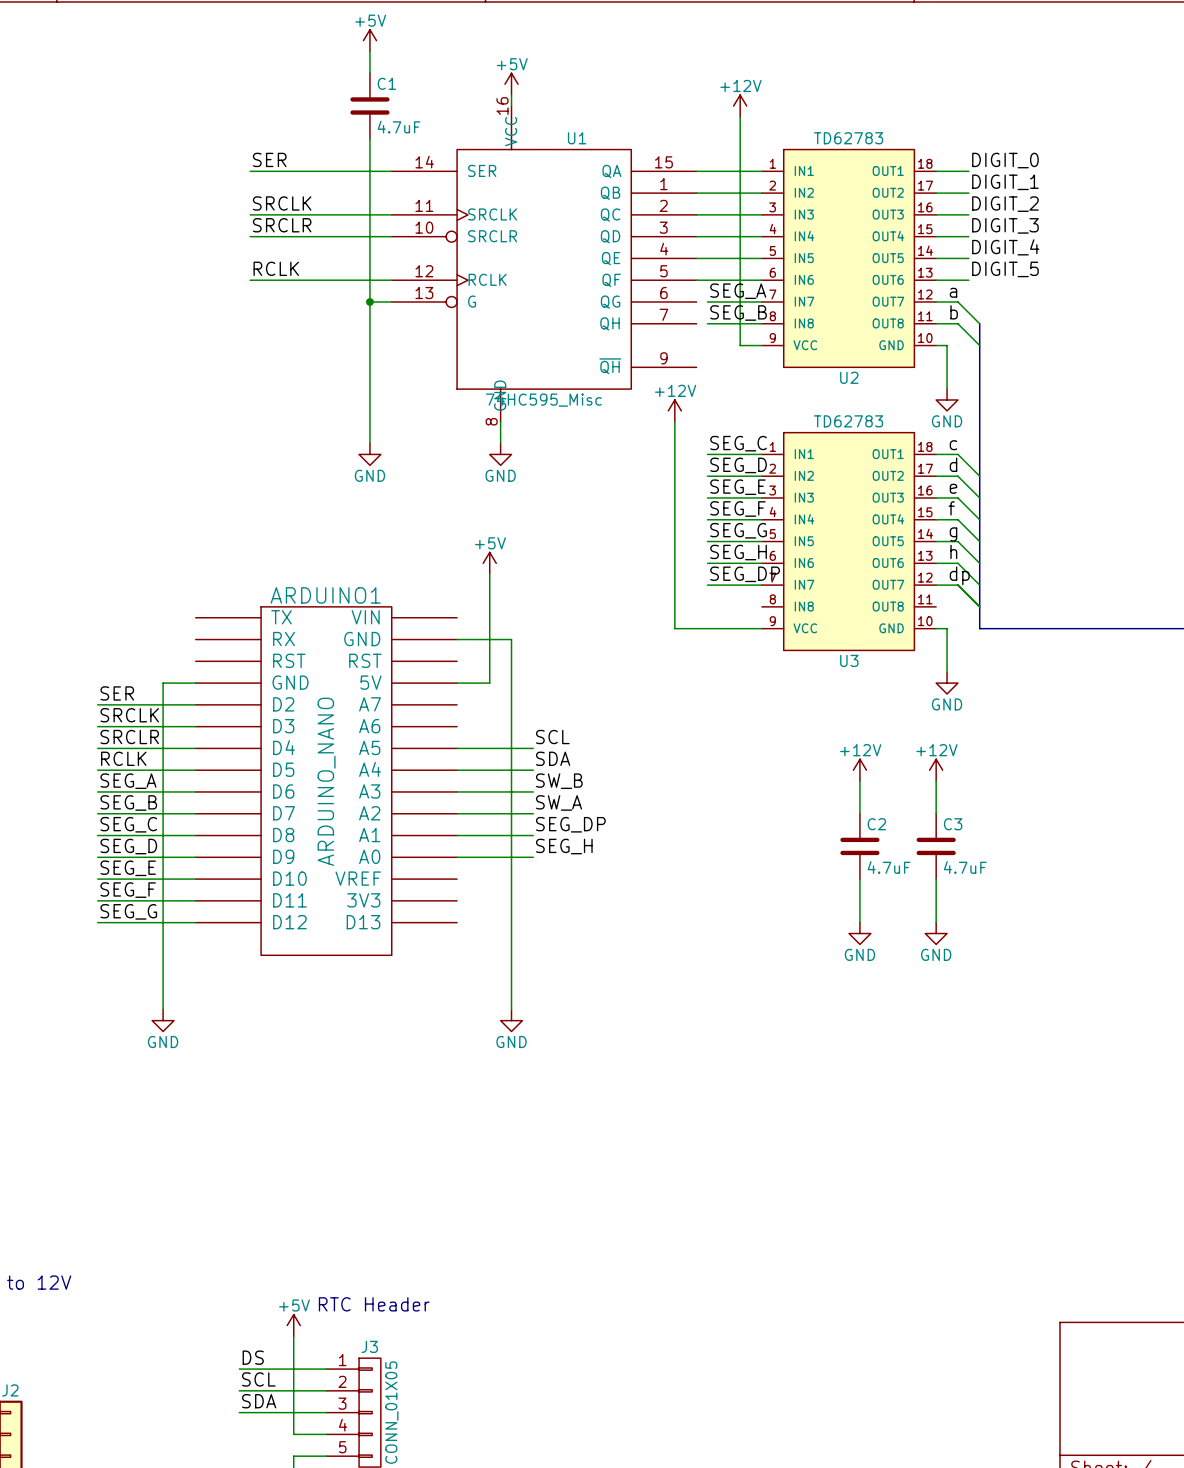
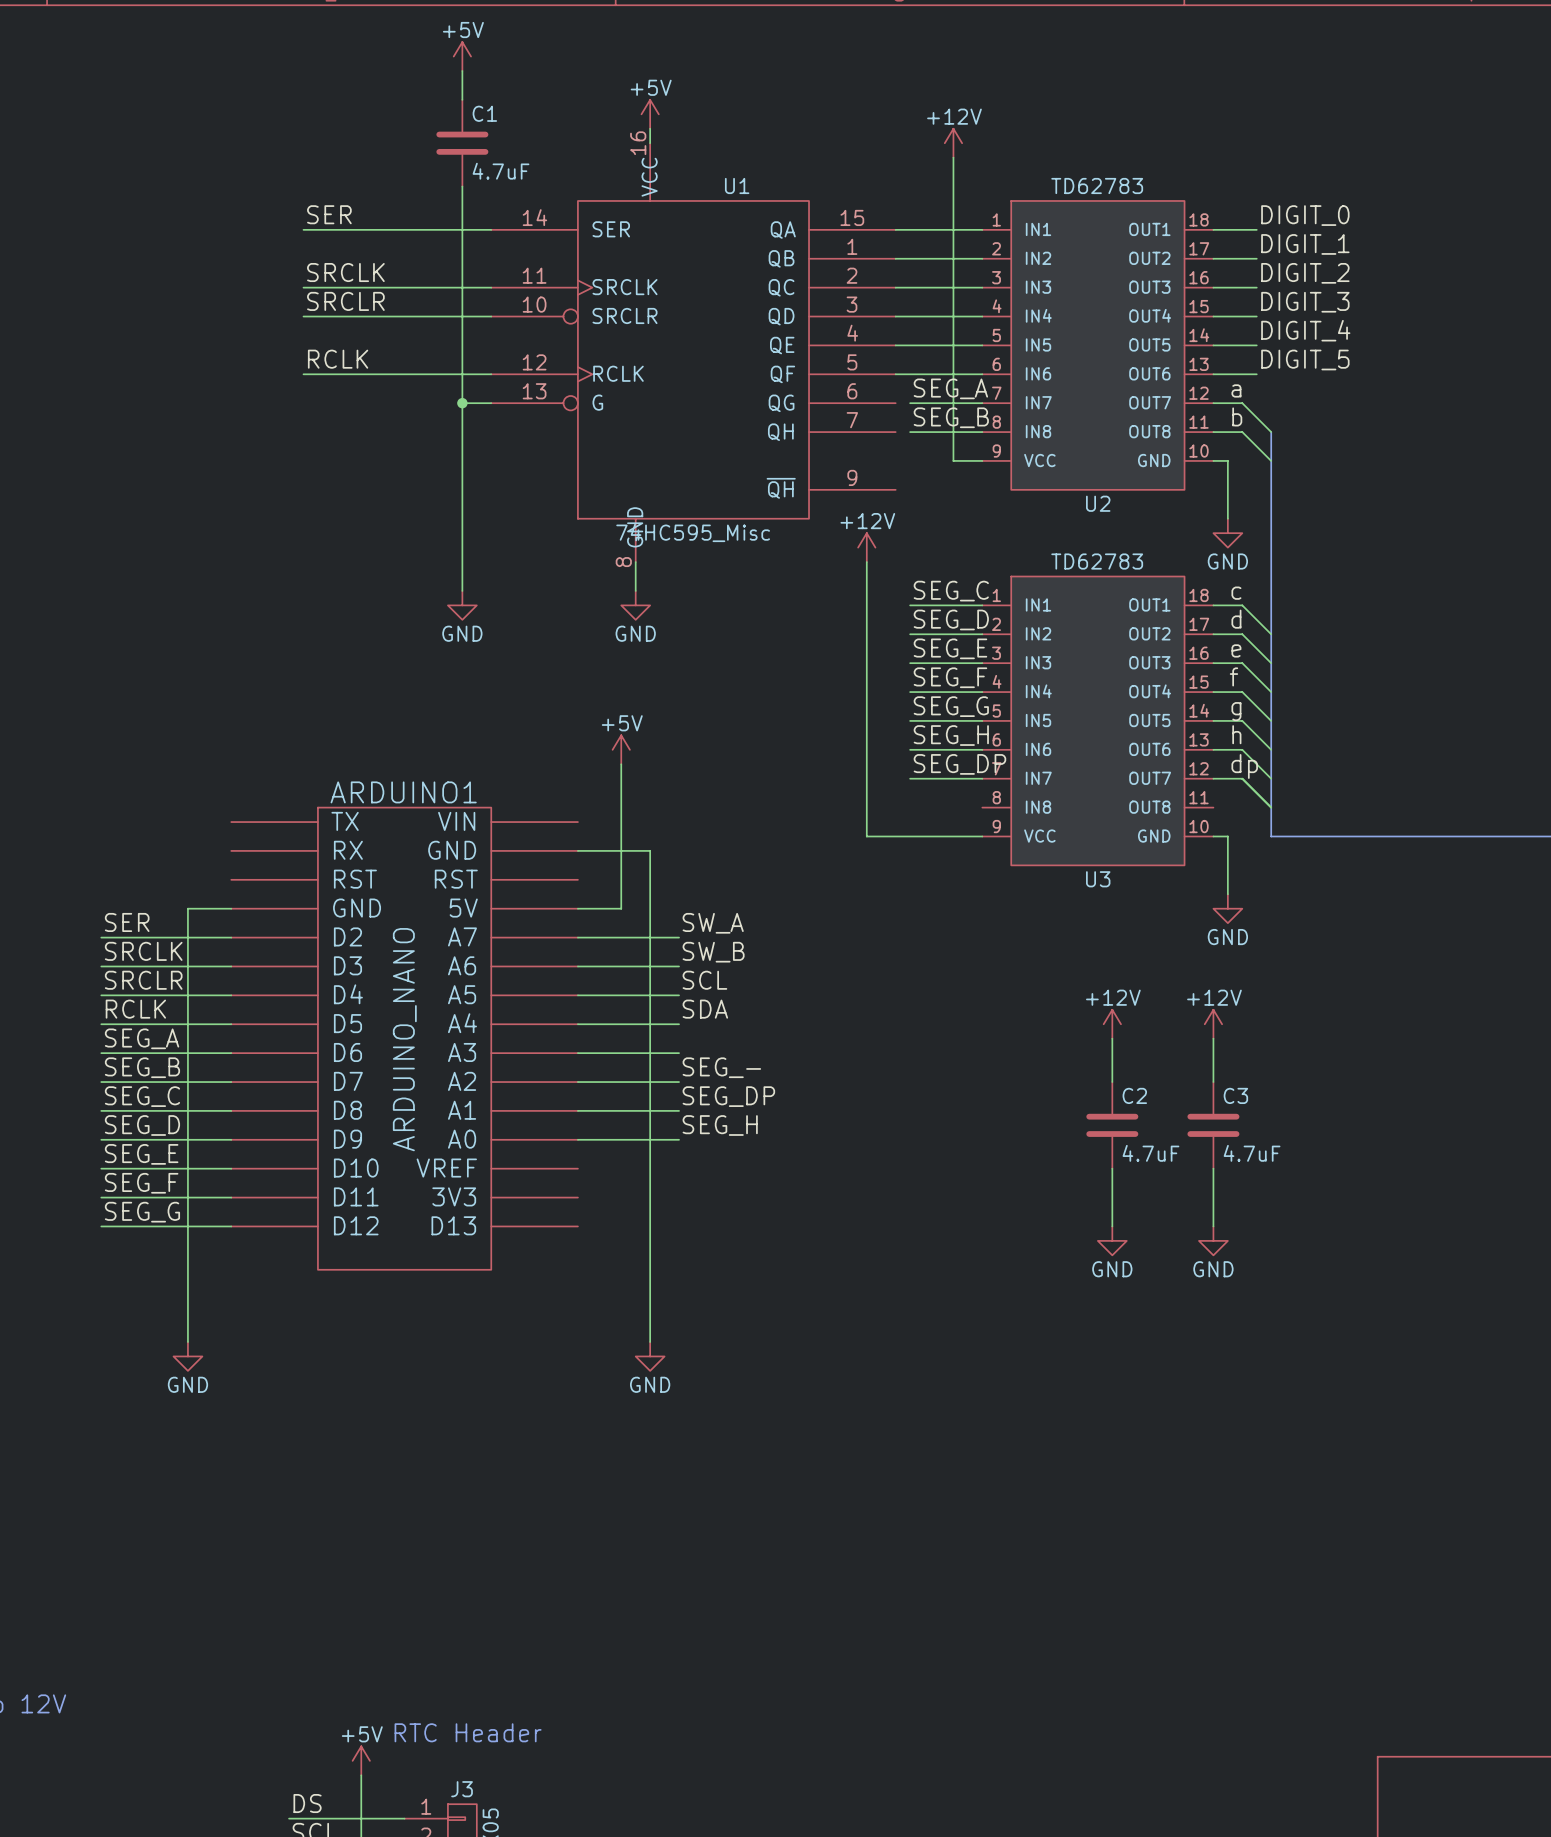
label: none -> SW_A (713, 923)
wire: none -> (577, 937) (679, 937)
wire: none -> (577, 966) (679, 966)
label position: SW_B (559, 781) -> SW_B (713, 952)
label: SW_A (559, 802) -> SEG_- (721, 1067)

